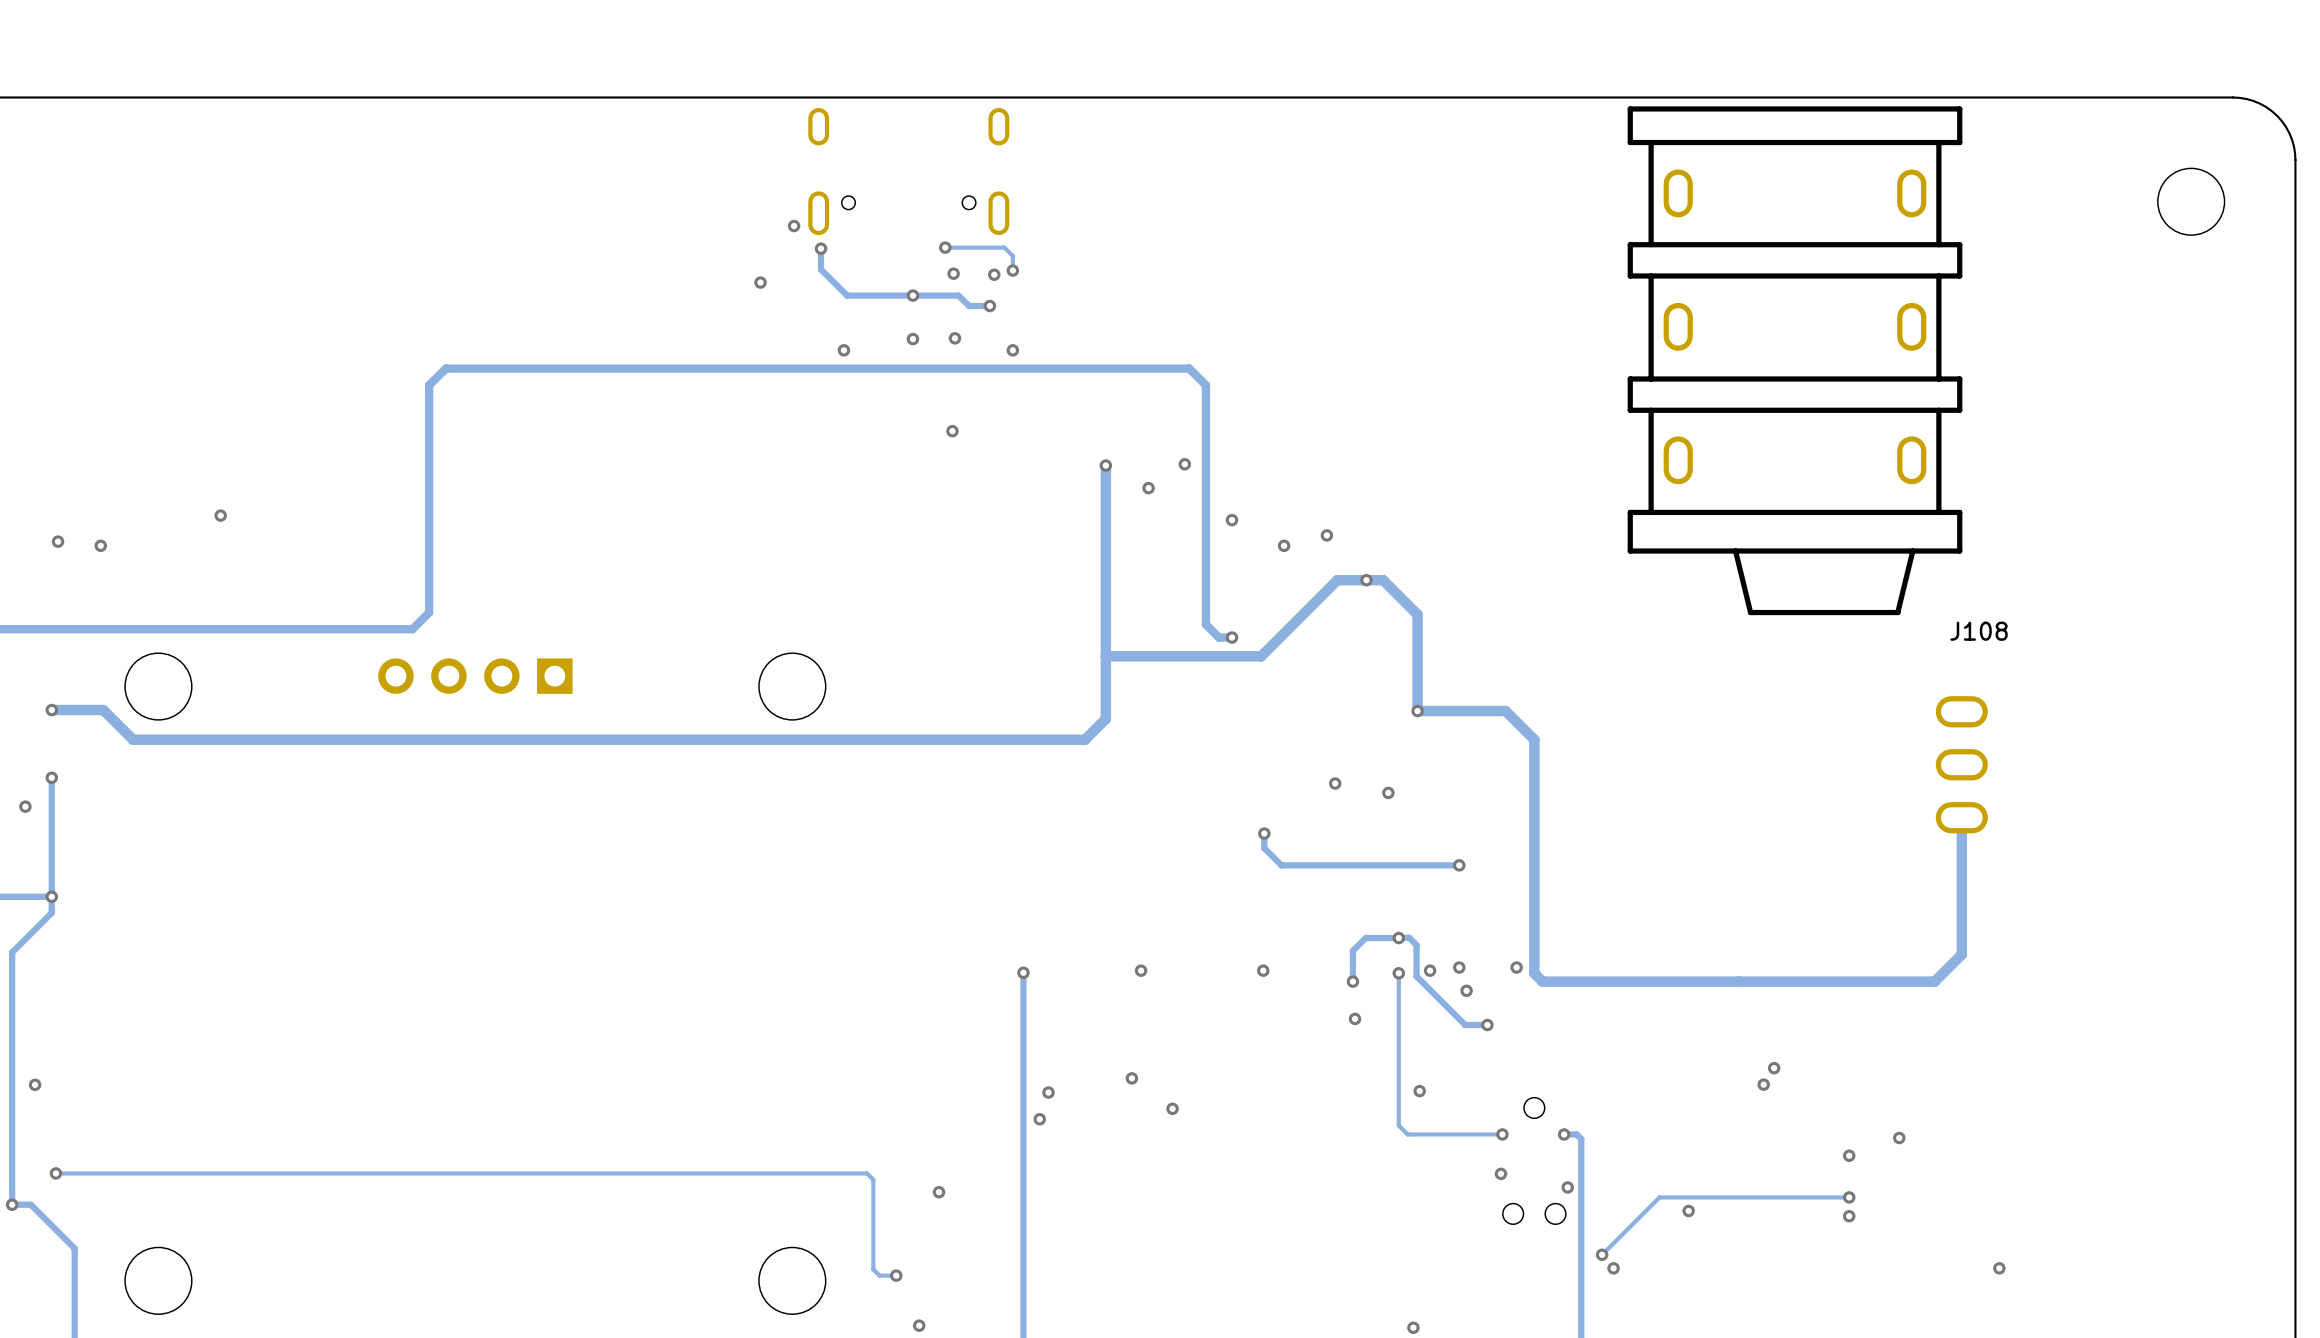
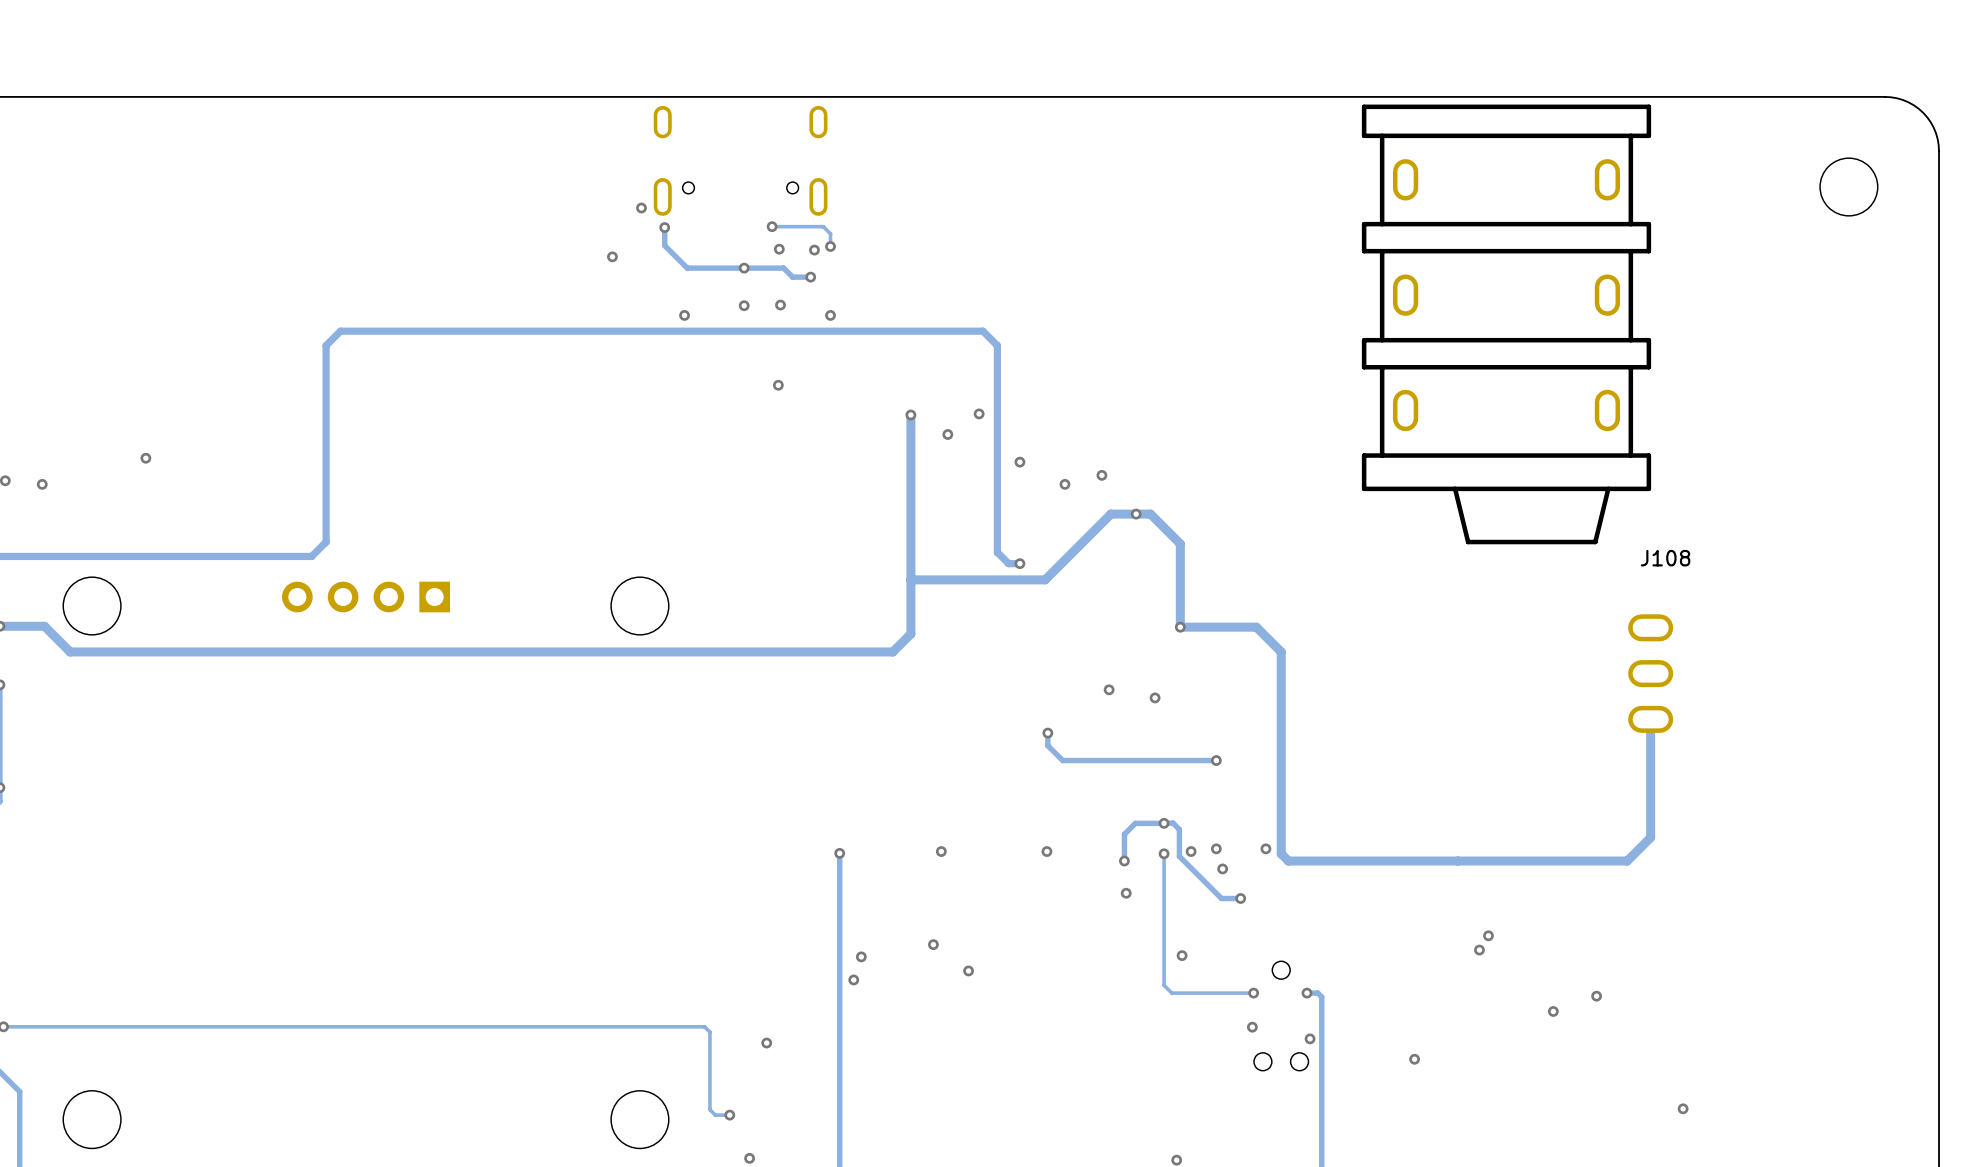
track: (1849, 1197) (1659, 1197) (1602, 1254) -> none
via: (1849, 1197) -> none
via: (1849, 1216) -> none
via: (1602, 1254) -> none
via: (1613, 1268) -> none

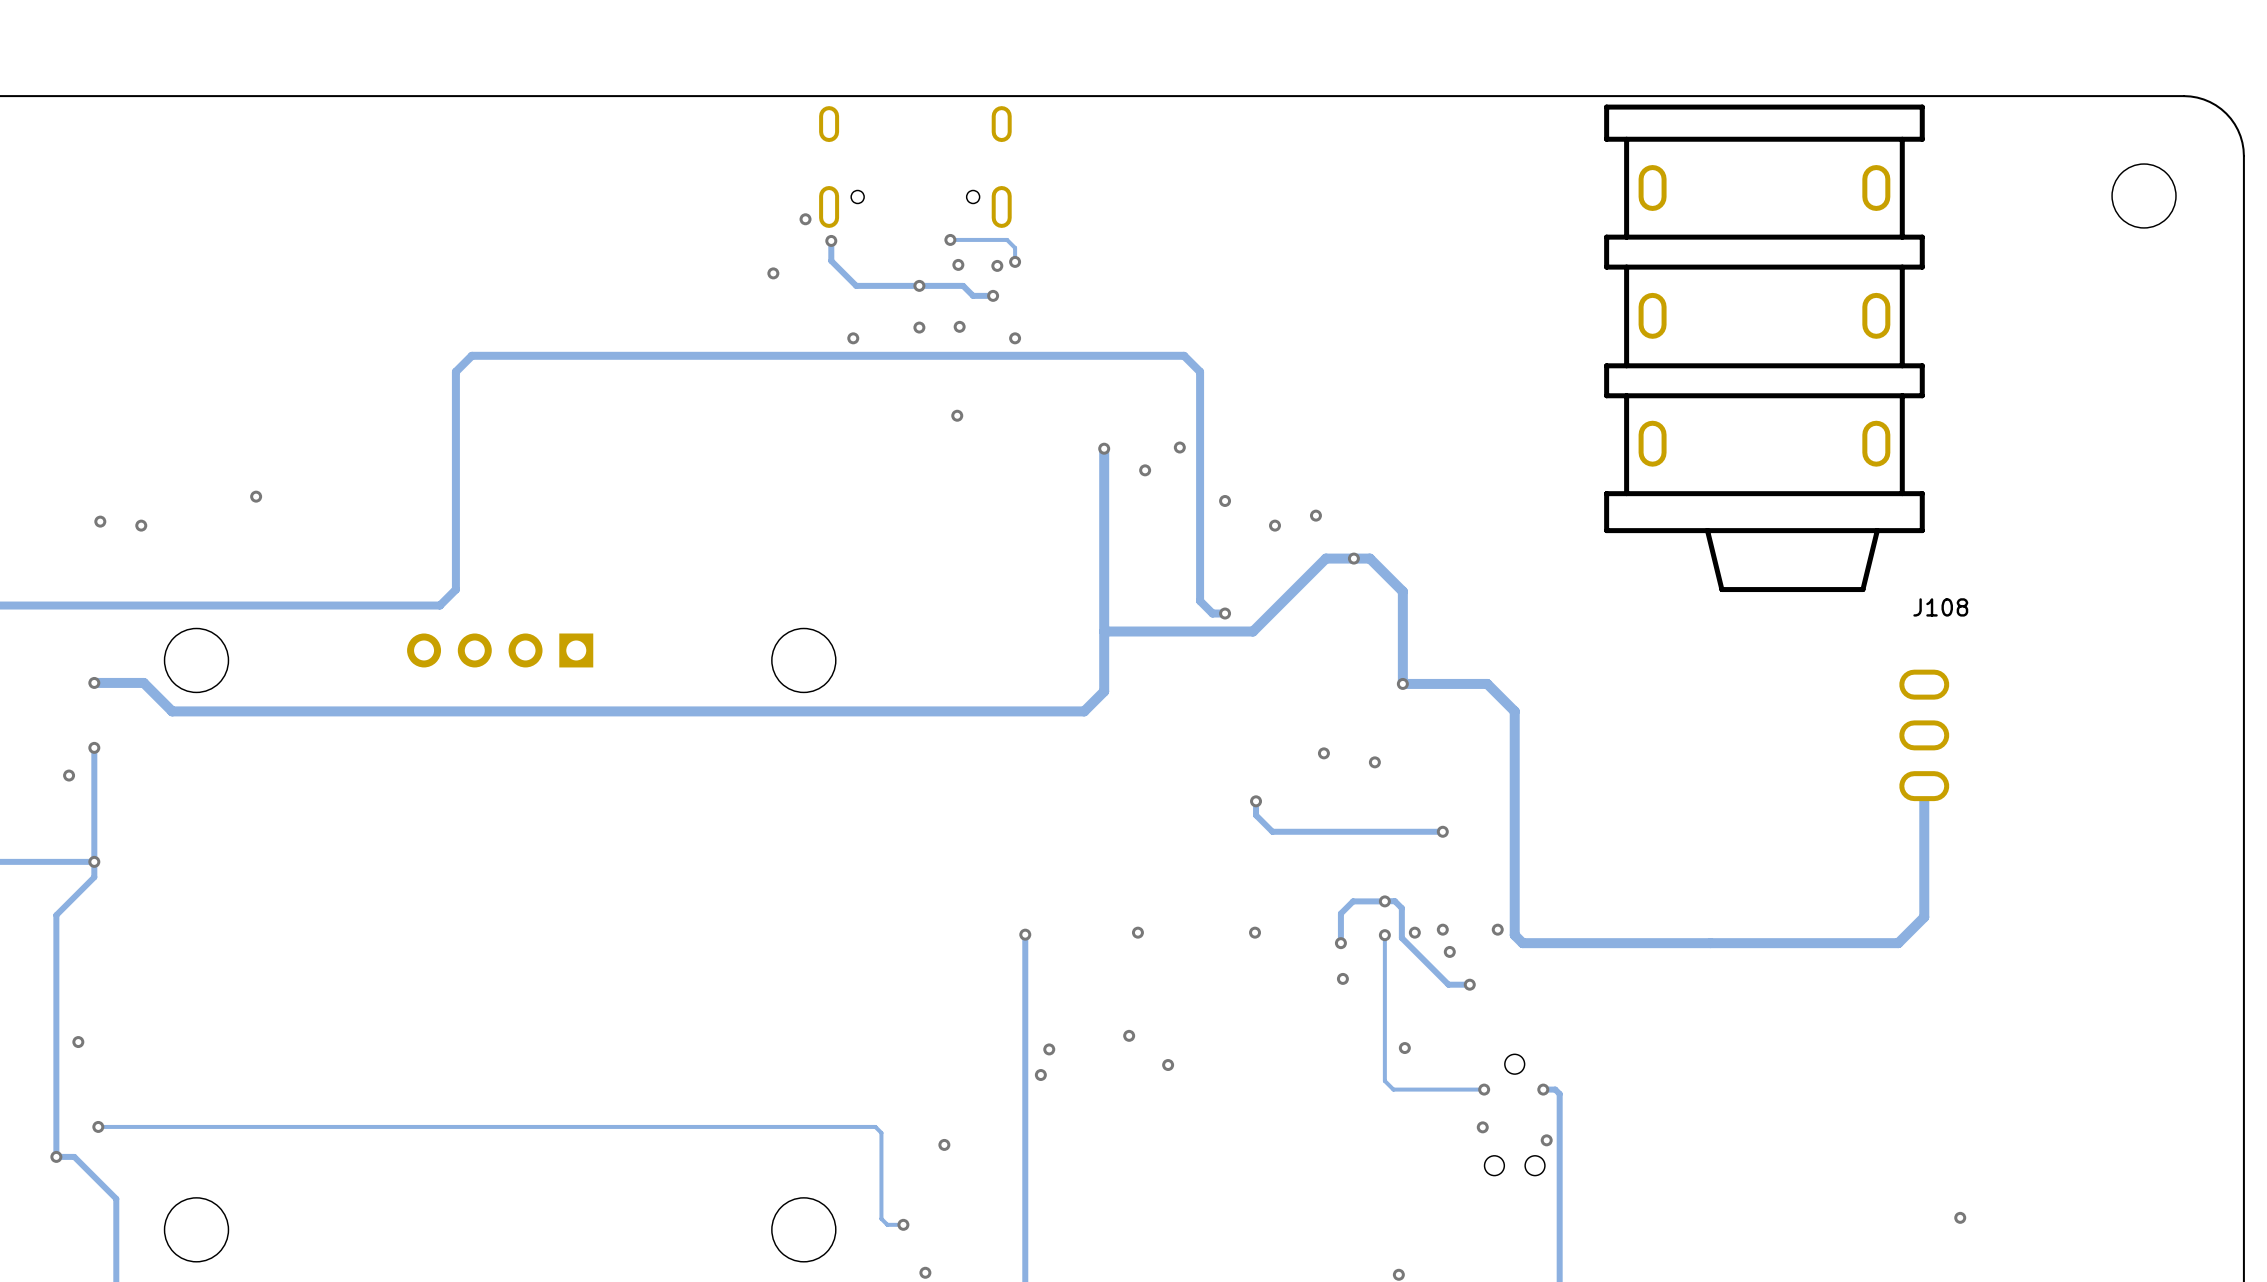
via: (1488, 935) -> none
via: (1479, 950) -> none
via: (1596, 996) -> none
via: (1553, 1011) -> none
via: (1414, 1059) -> none

